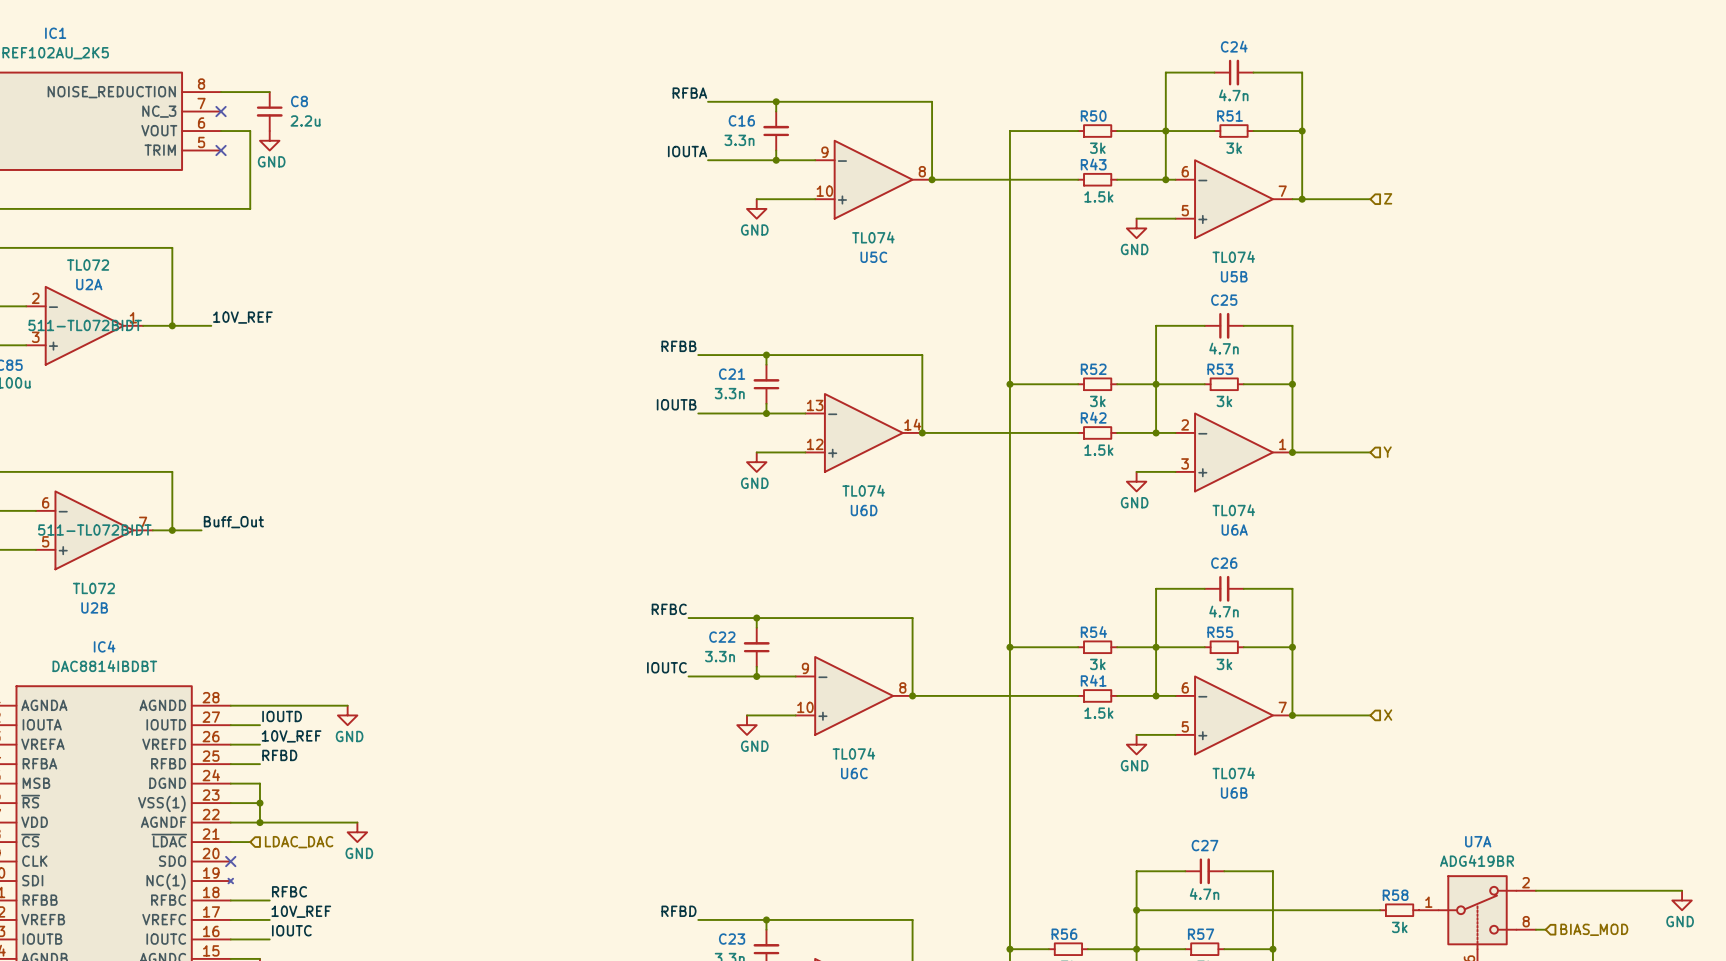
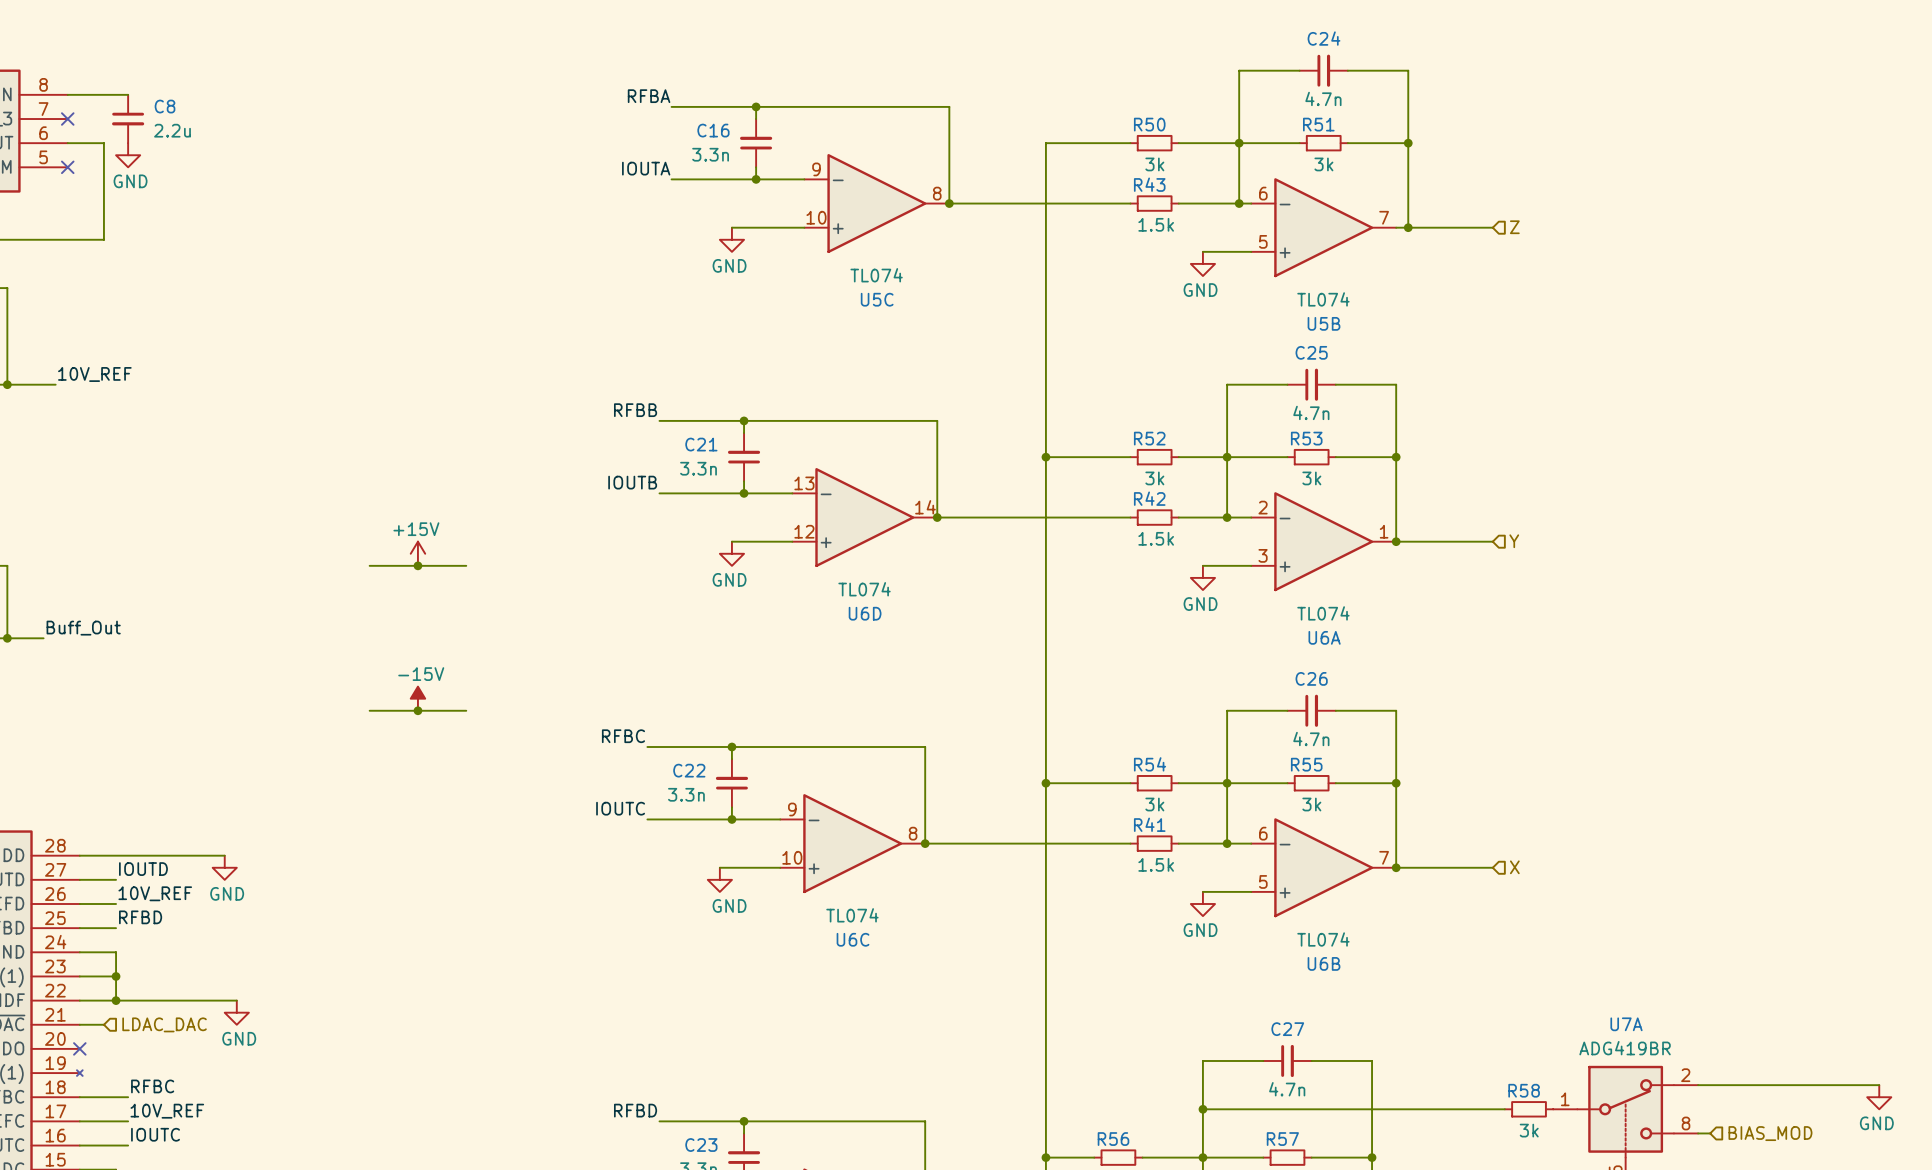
power symbol: none -> +15V (417, 553)
wire: none -> (369, 565) (466, 565)
junction: none -> (417, 565)
power symbol: none -> -15V (417, 698)
wire: none -> (369, 710) (466, 710)
junction: none -> (417, 710)

